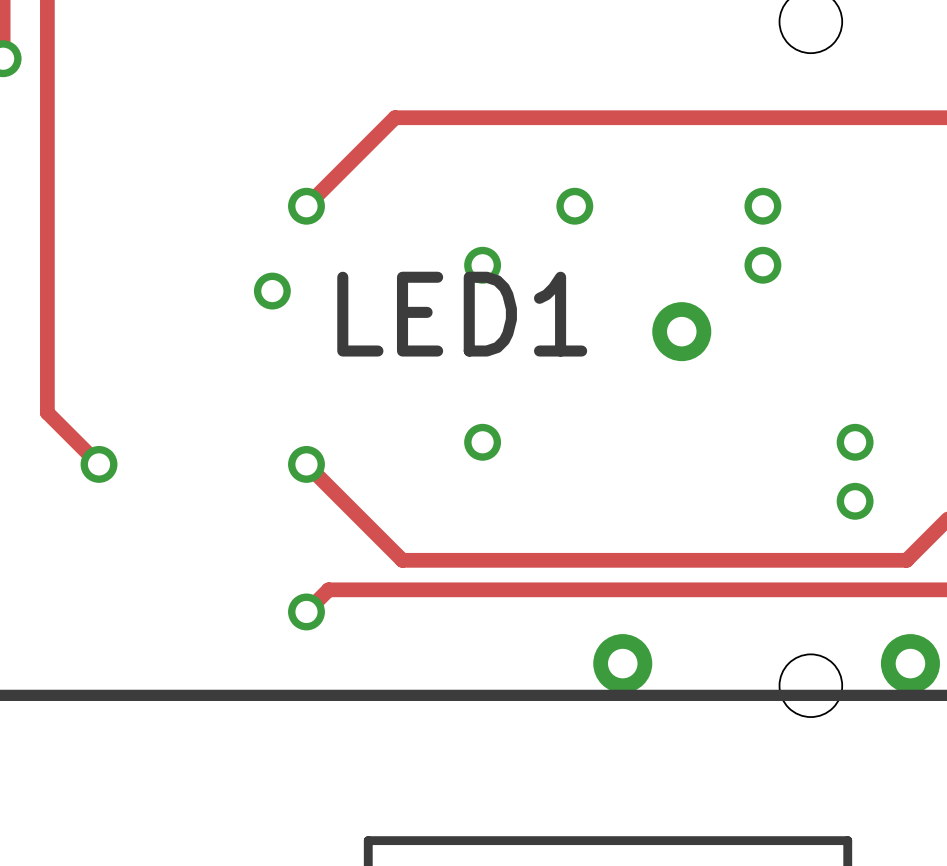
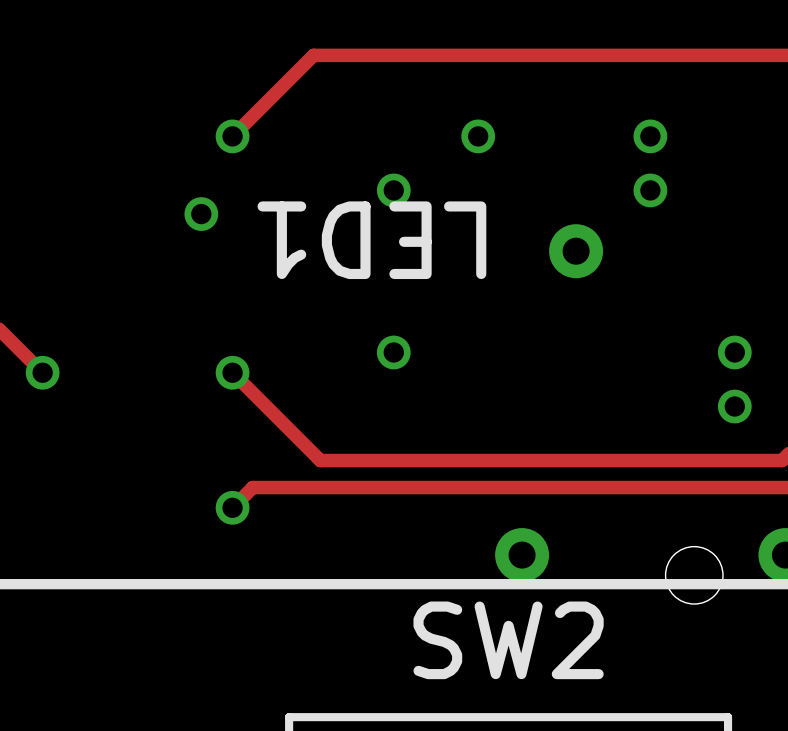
LED1 name rotation: 0° (462, 314) -> 180° (371, 240)
SW2 name: none -> SW2 (508, 640)

